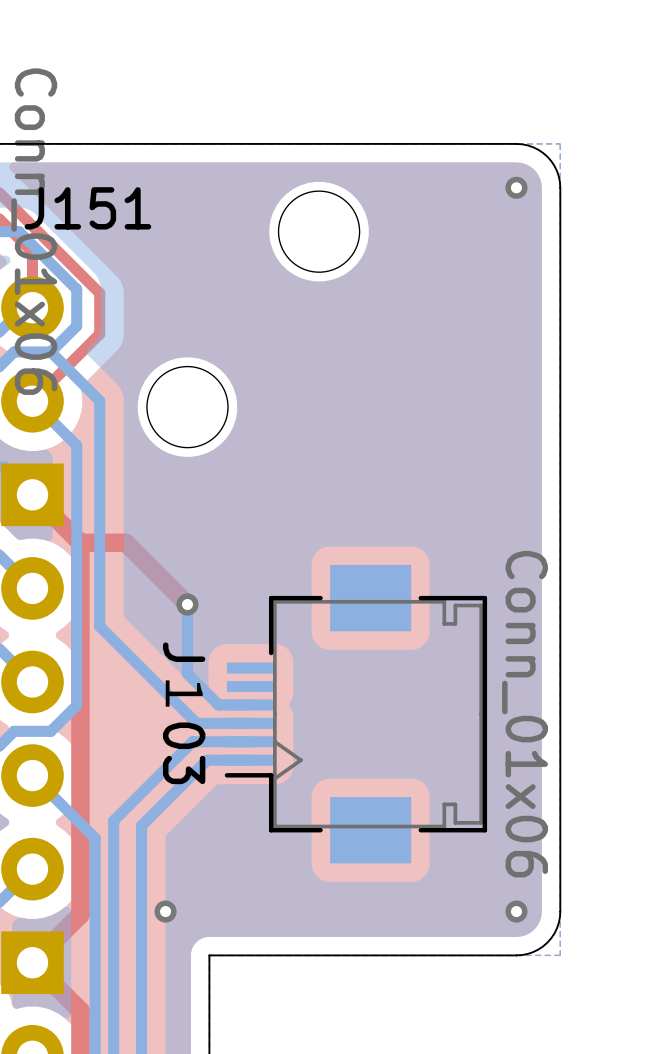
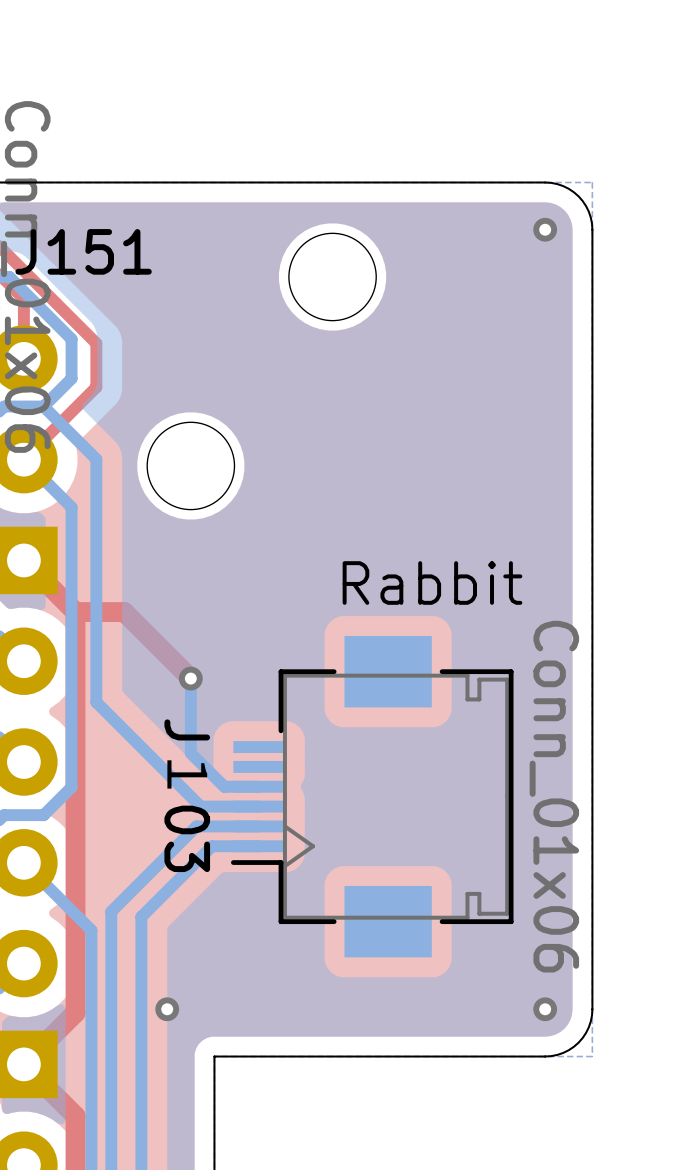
text: none -> Rabbit (432, 583)

